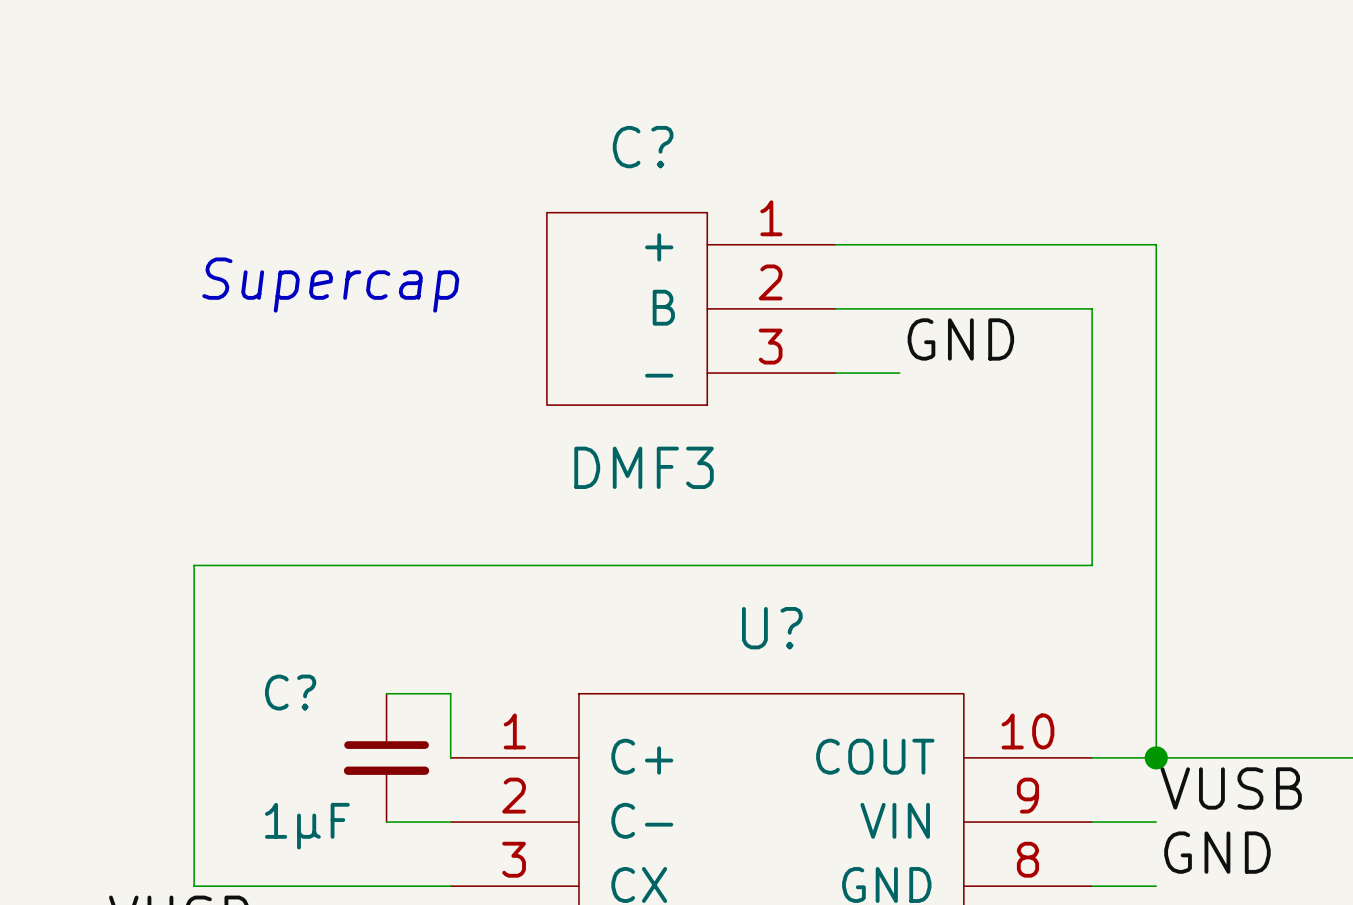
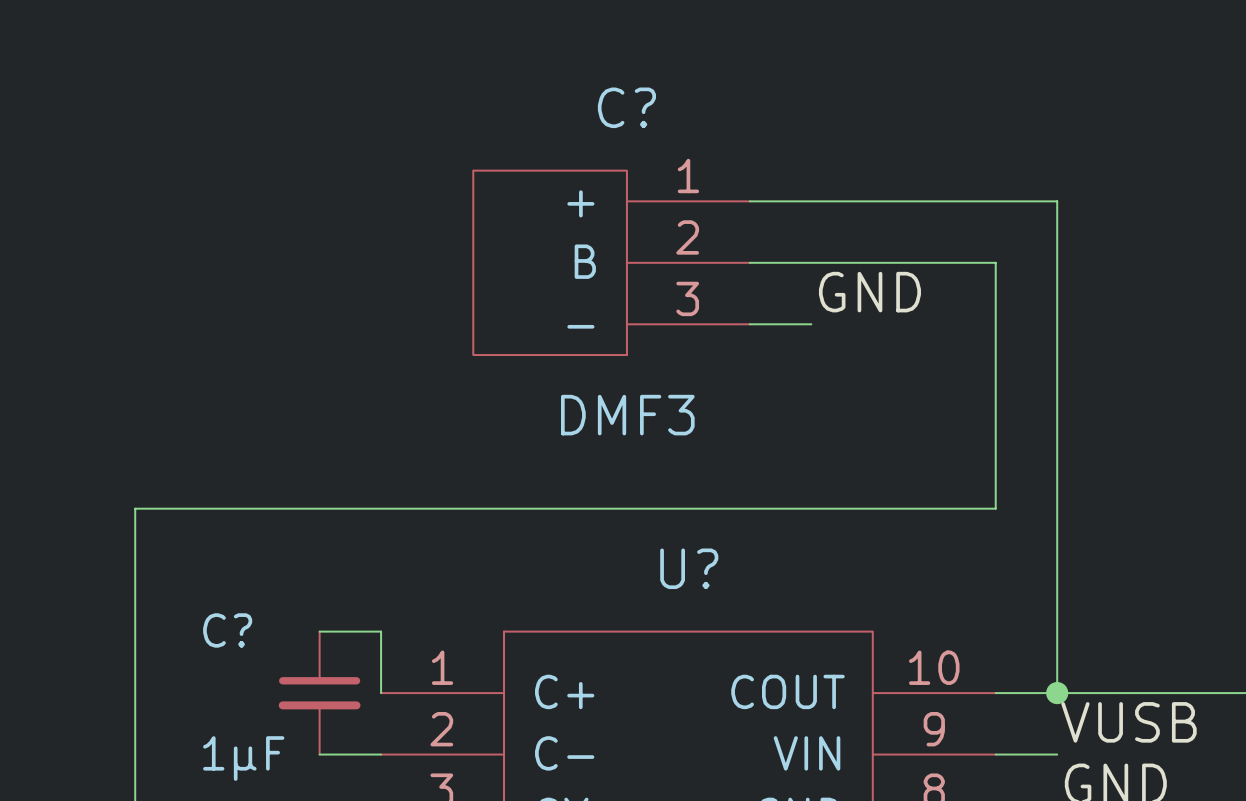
C? name position: C? (643, 147) -> C? (626, 107)
text: Supercap (330, 285) -> none
C? value position: DMF3 (644, 467) -> DMF3 (627, 415)

